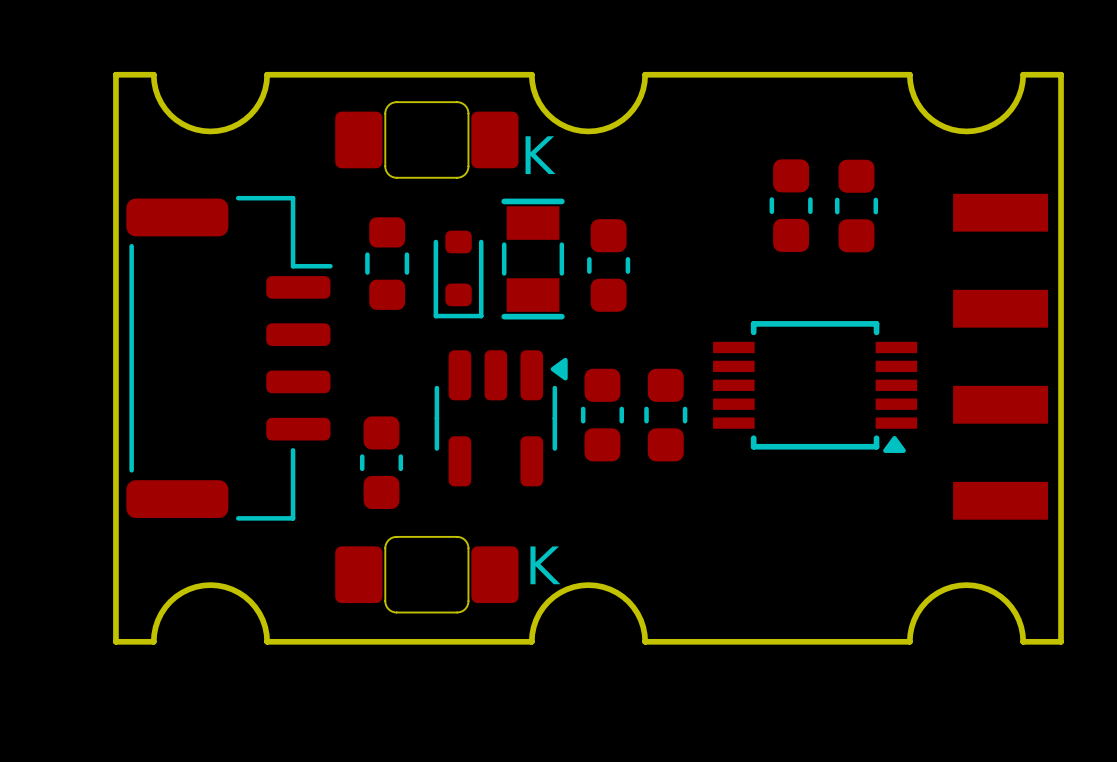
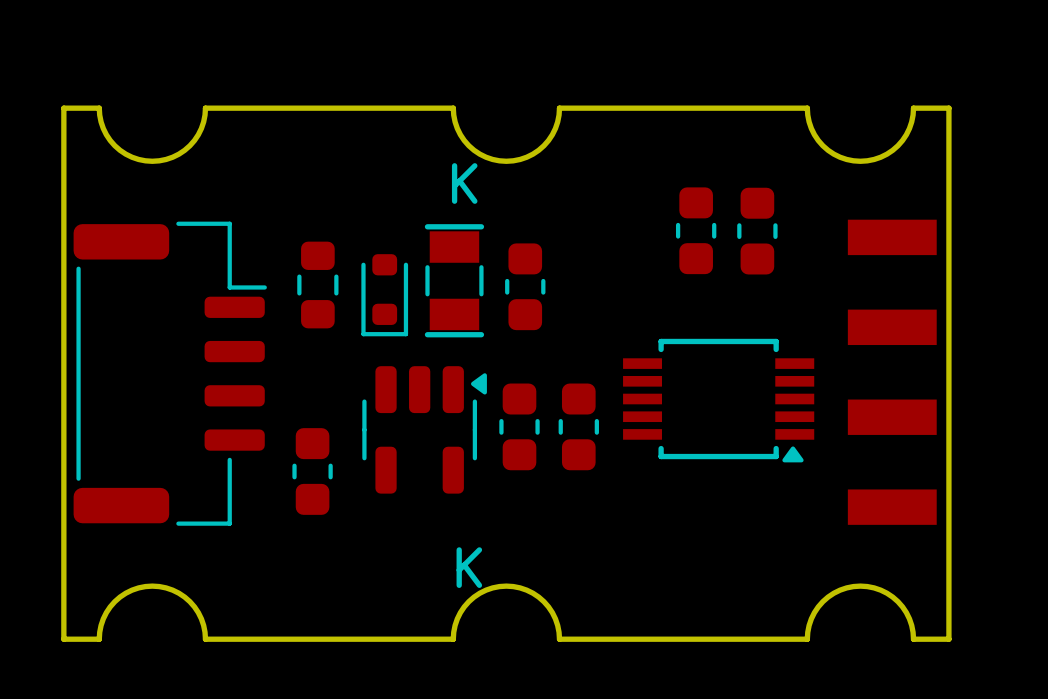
part: (426, 139) -> none
part: (426, 574) -> none

